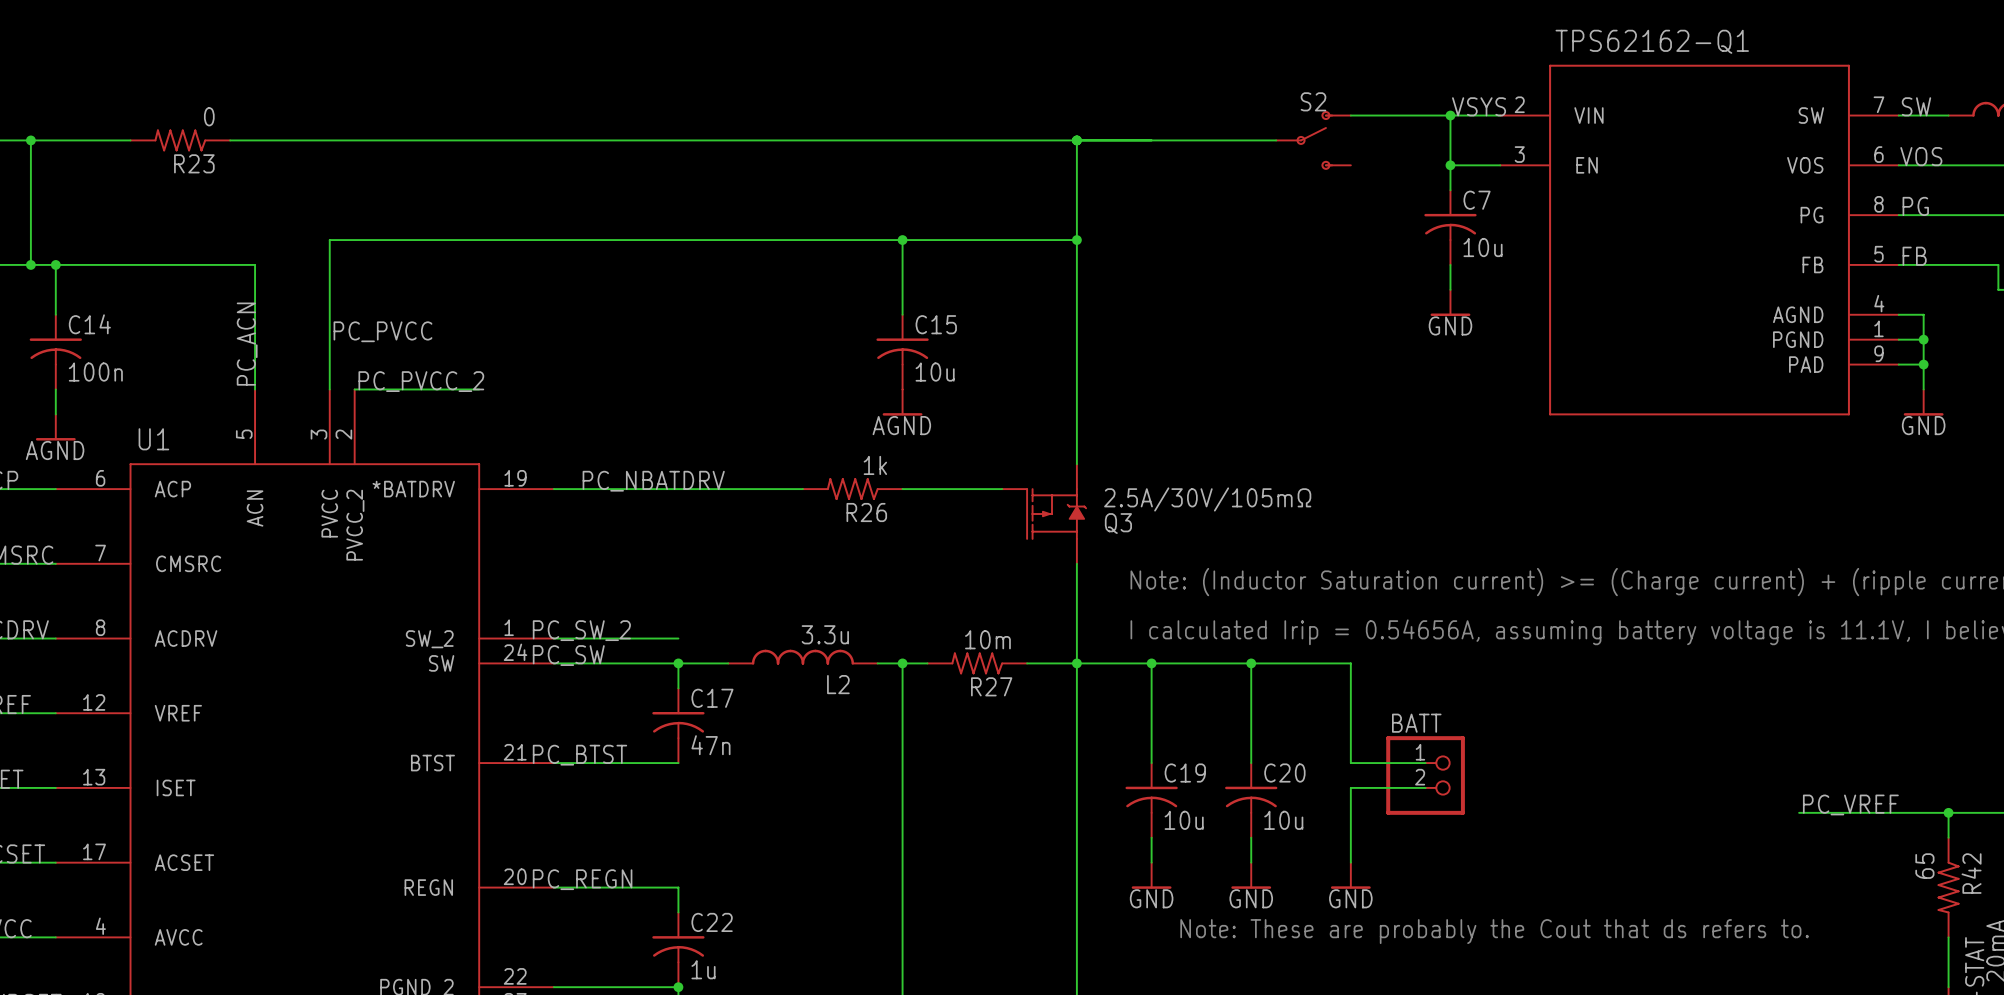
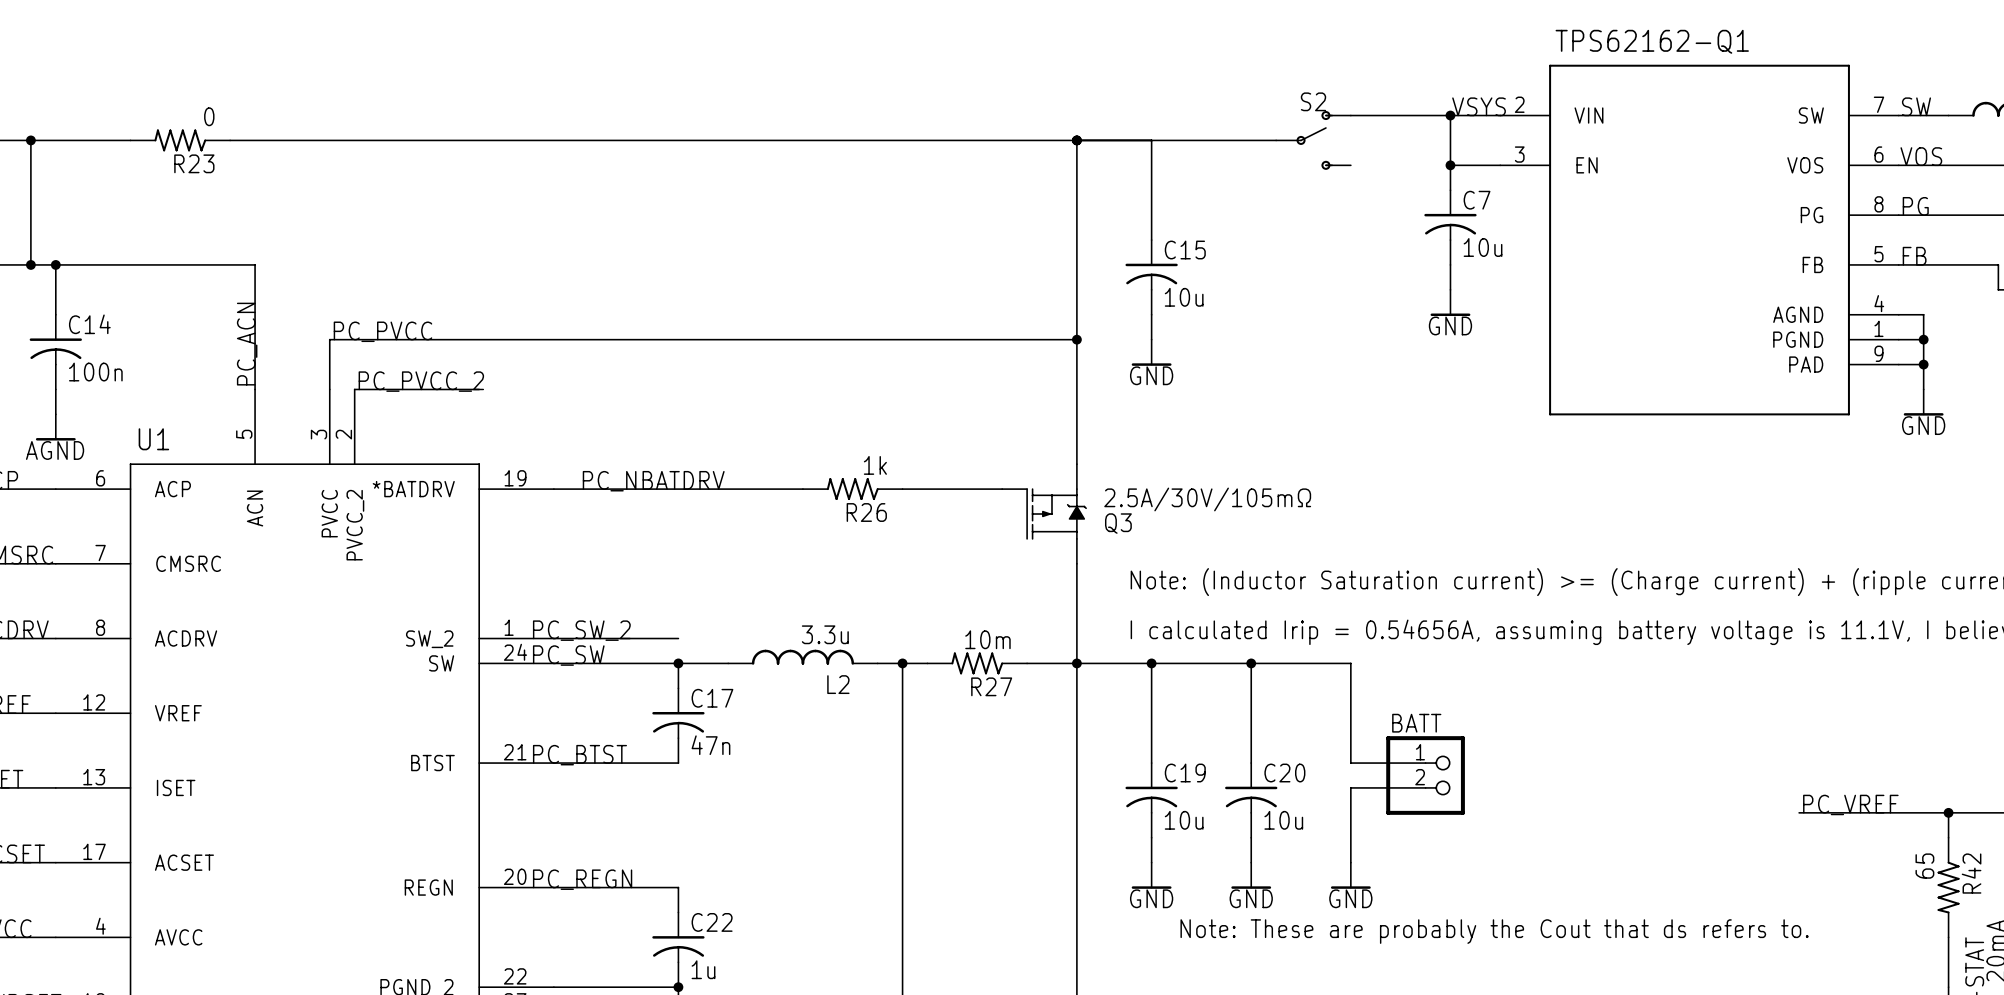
wire: none -> (1151, 140) (1151, 240)
wire: (902, 240) (902, 314) -> none
junction: (902, 240) -> none
wire: (1076, 240) (329, 240) (329, 339) -> (1076, 339) (329, 339)
junction: (1076, 240) -> none
wire: none -> (1151, 314) (1151, 339)
junction: none -> (1076, 339)
C15 position: (902, 352) -> (1151, 277)
power symbol: none -> GND (1151, 352)
power symbol: AGND (902, 402) -> none

